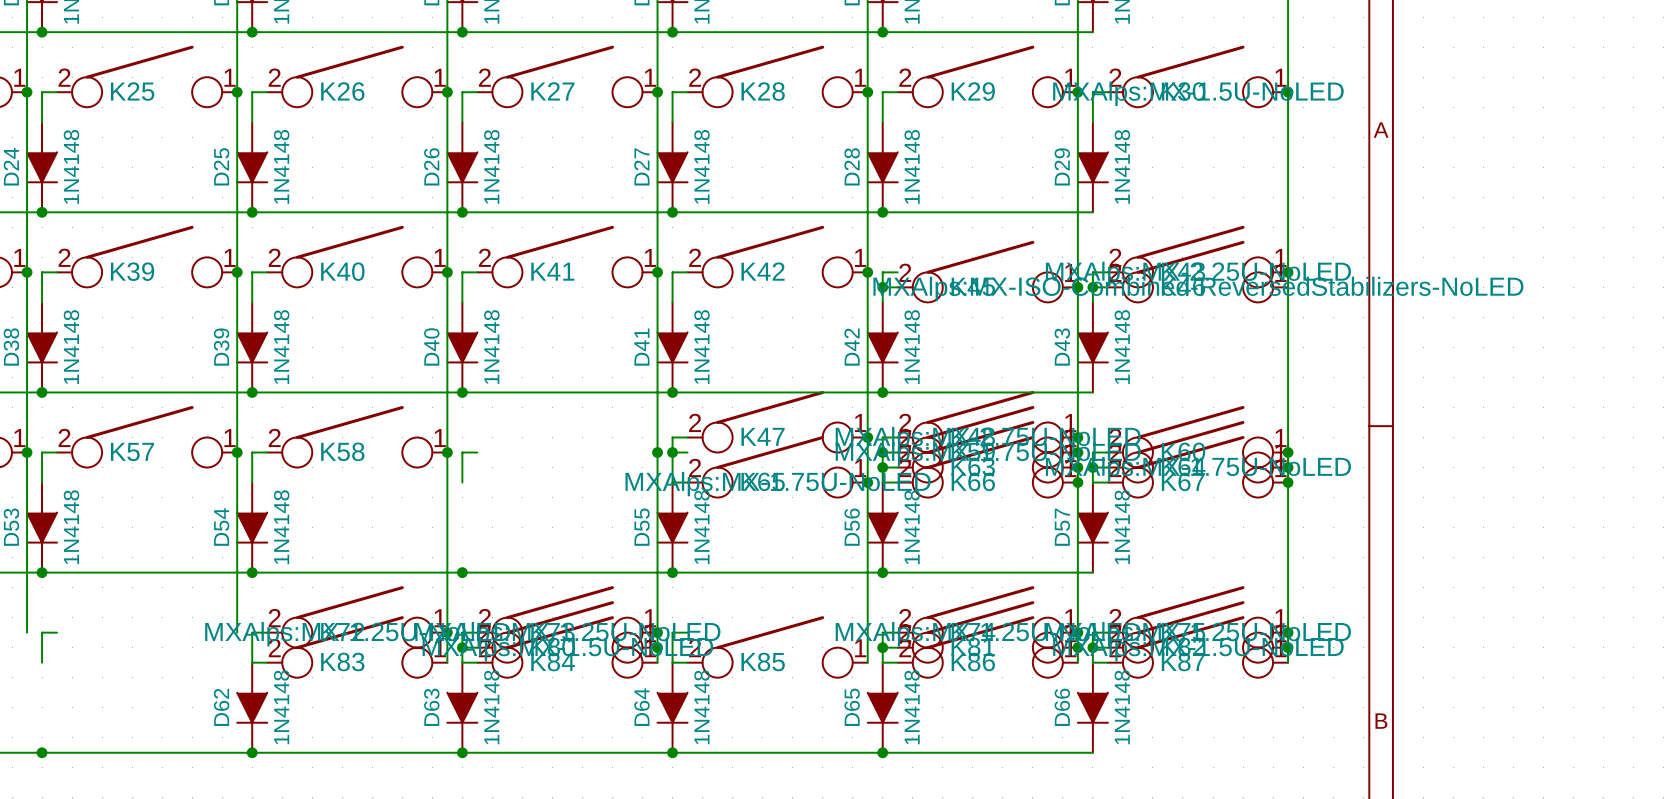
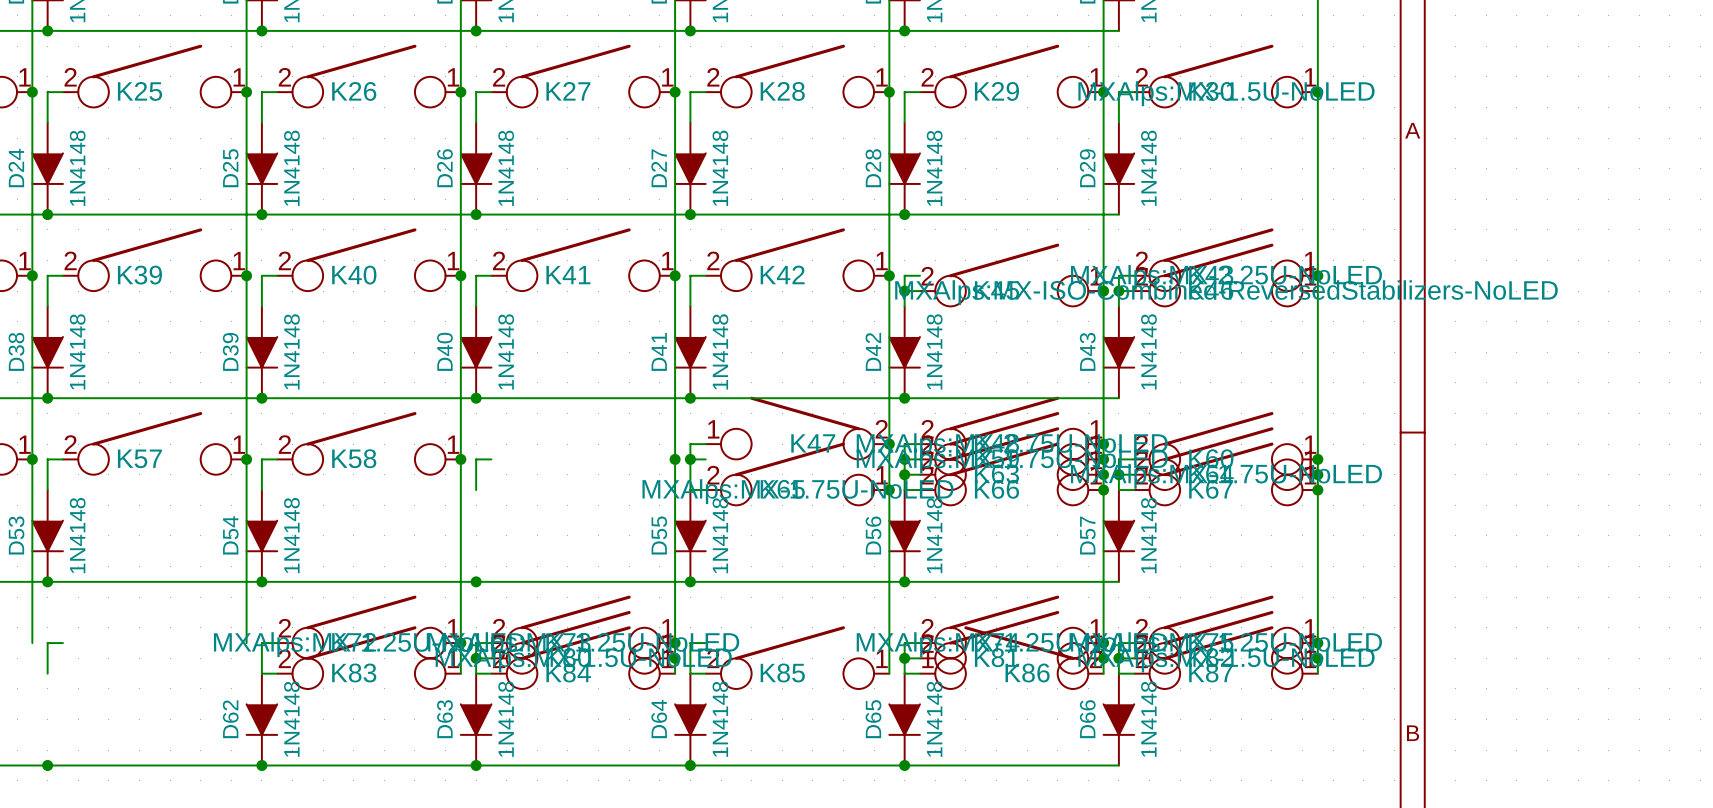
K47 flip: as is (777, 421) -> left-right (797, 428)
K86 flip: as is (987, 646) -> left-right (1011, 657)

